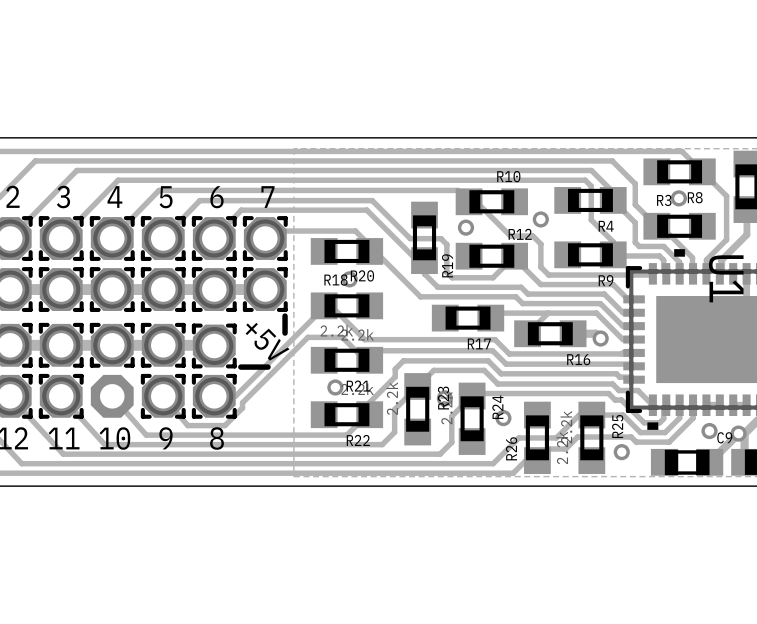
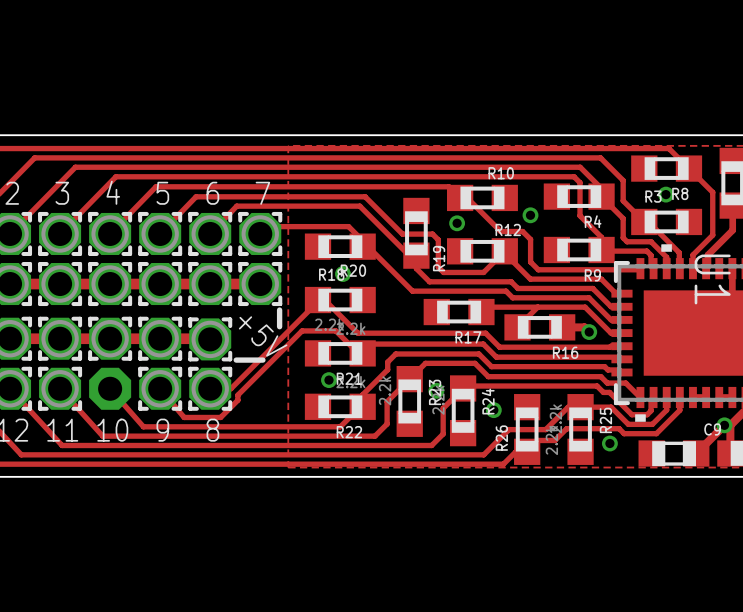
via: (709, 431) -> none

